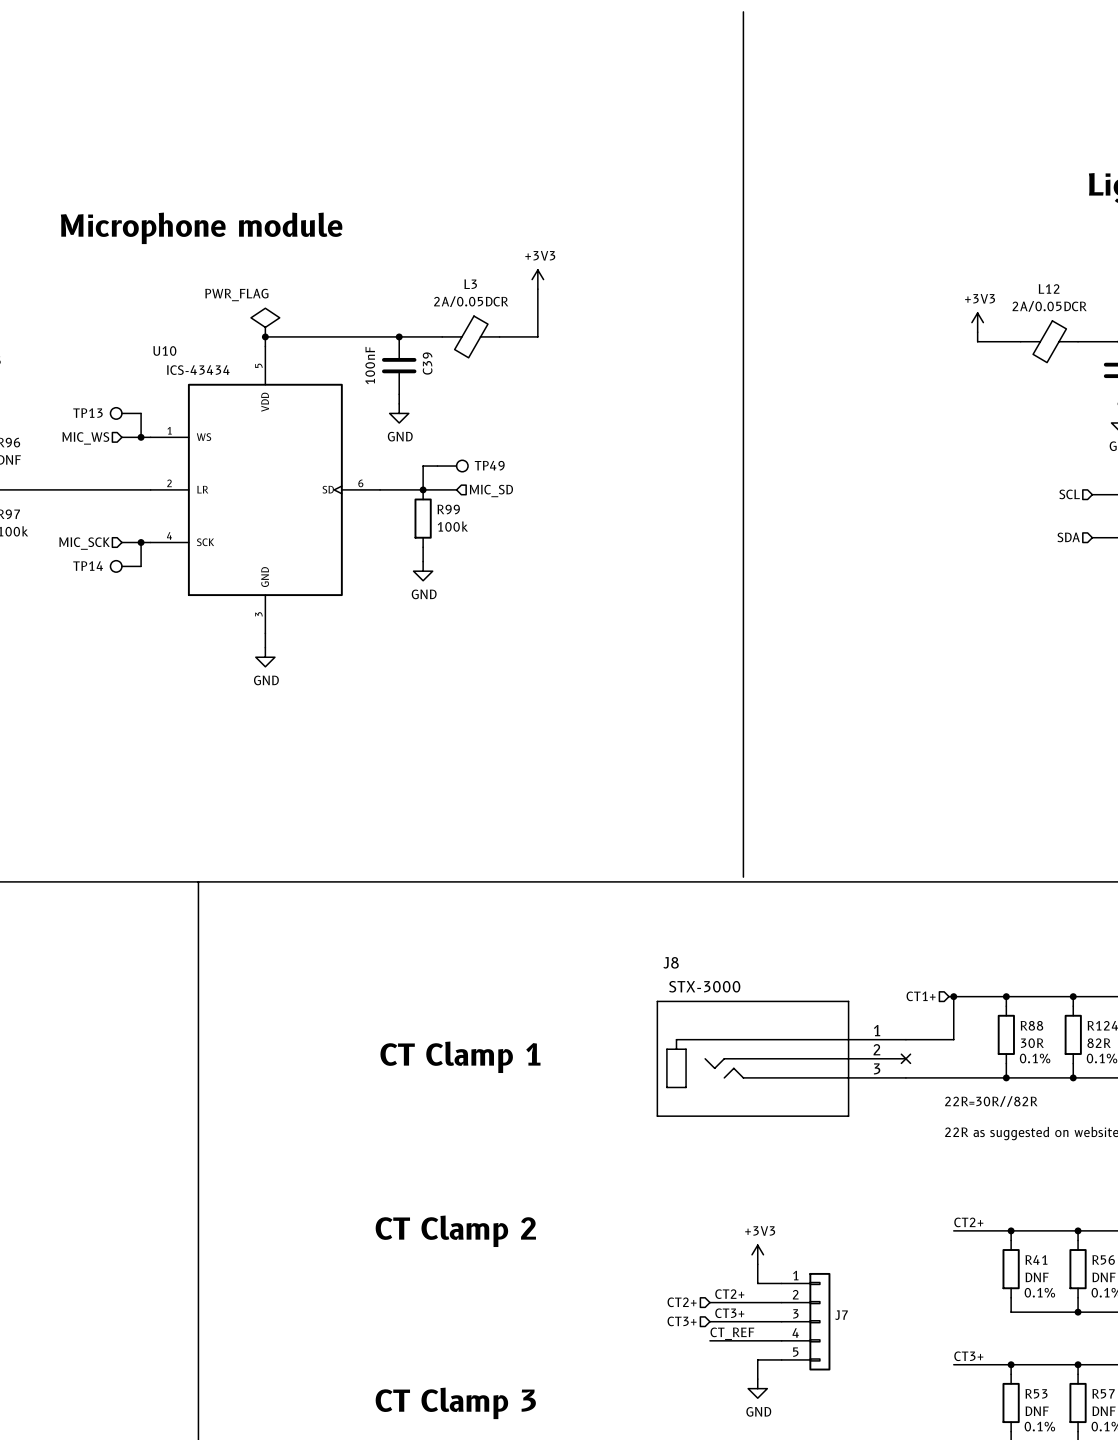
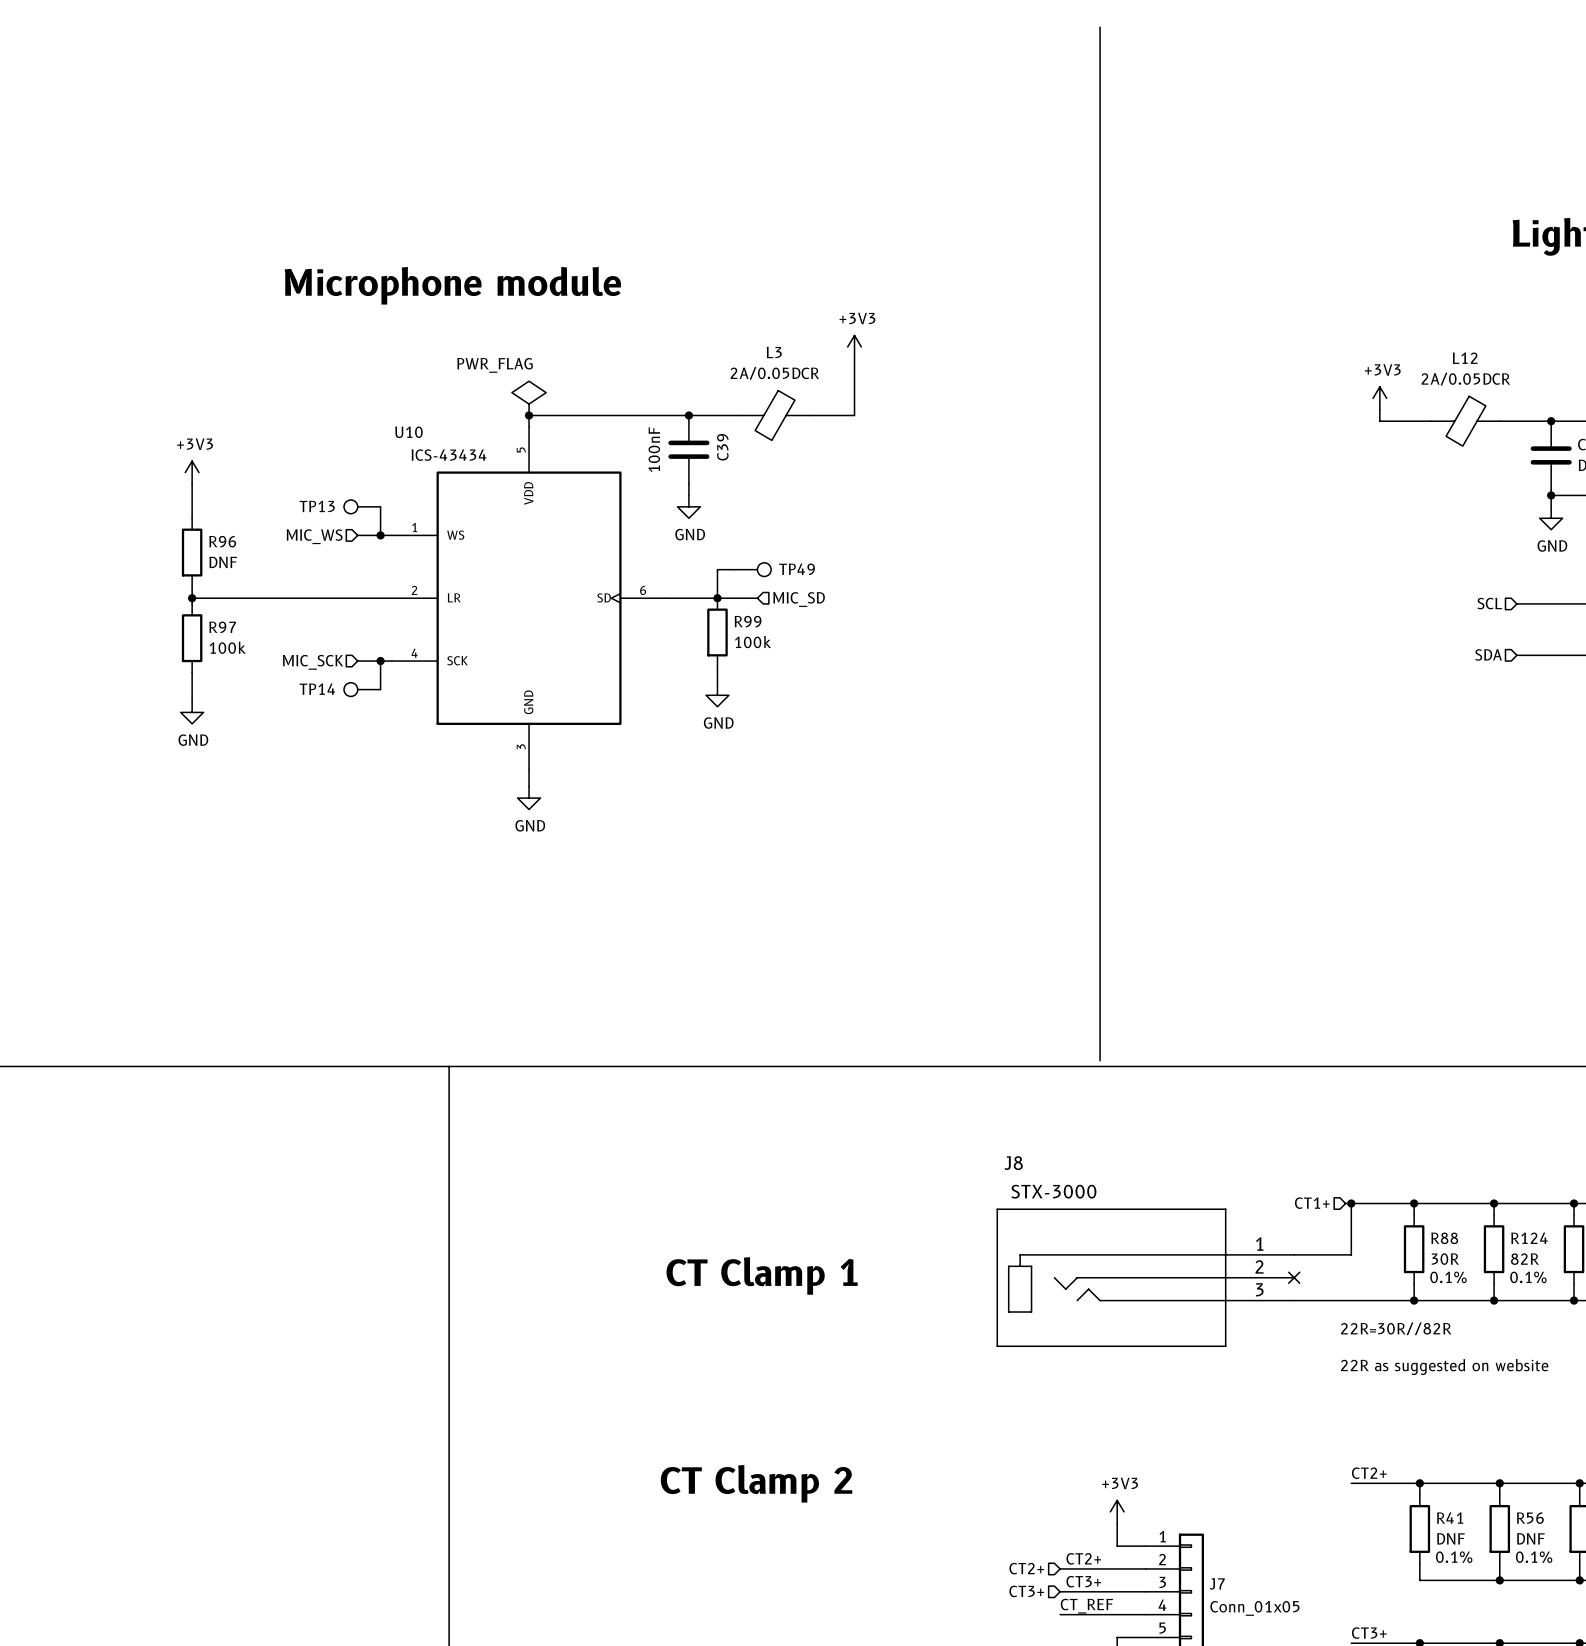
J7 value: none -> Conn_01x05 (1254, 1608)

